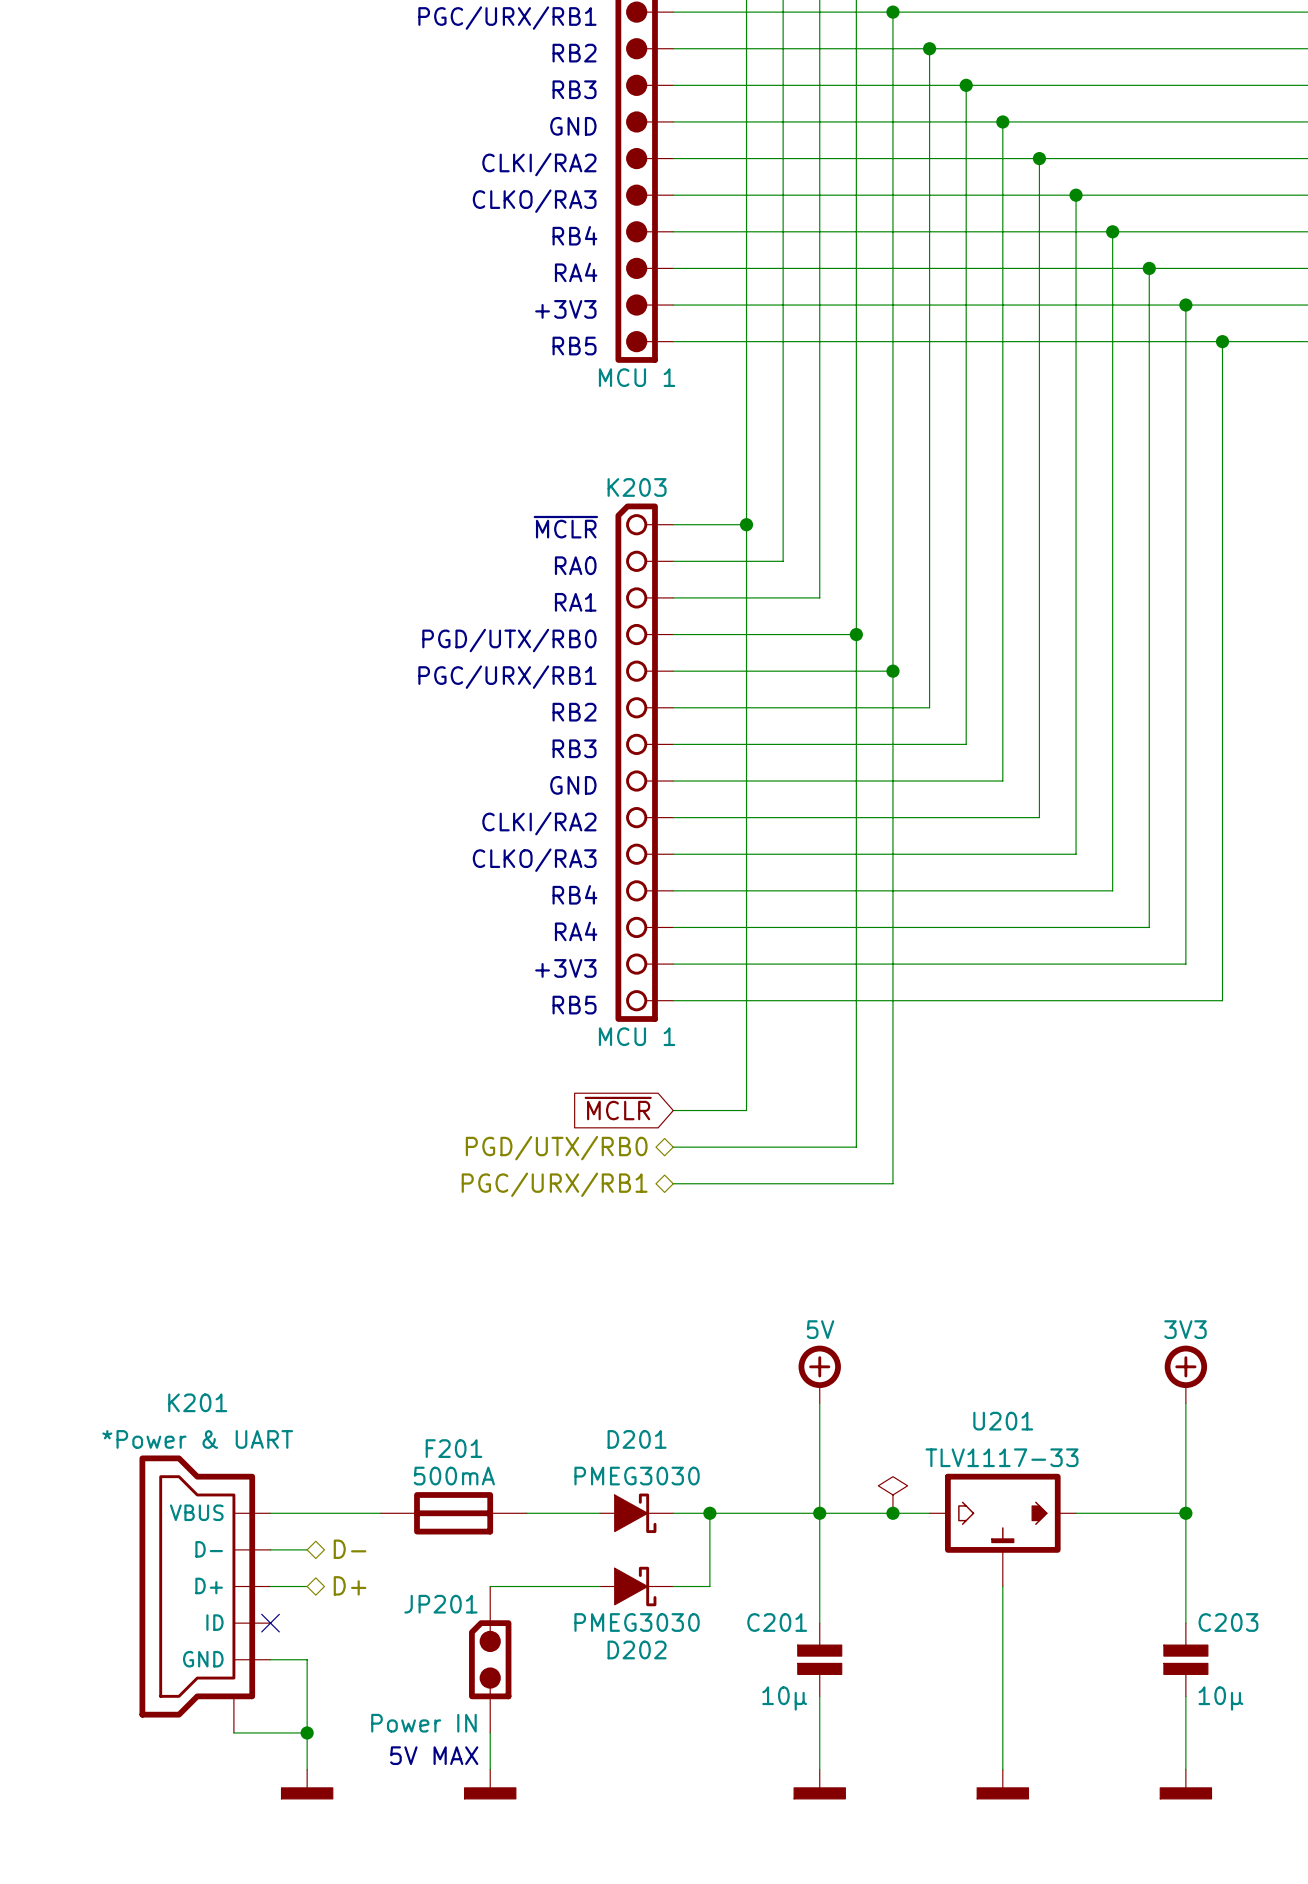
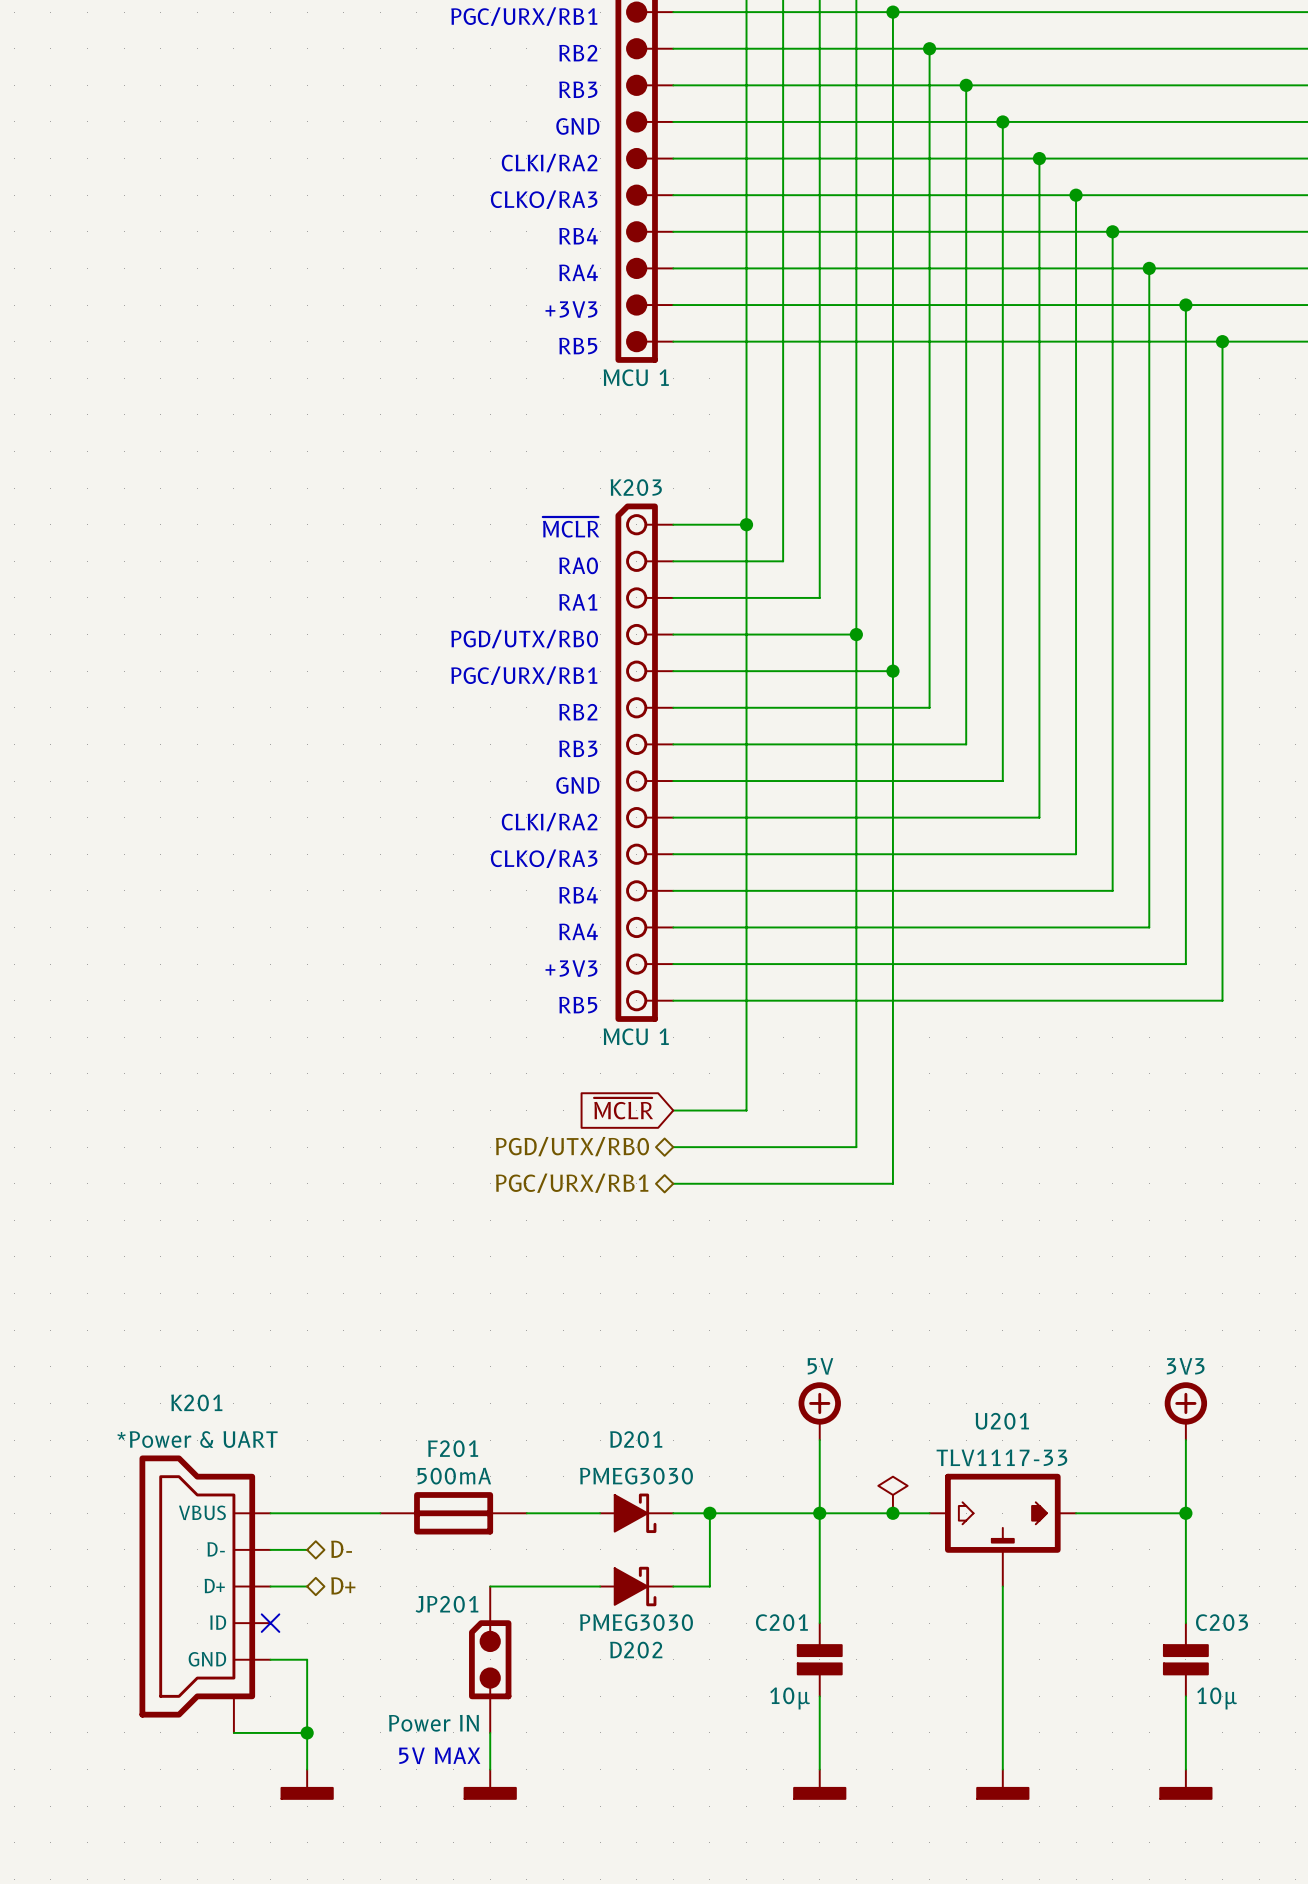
power symbol position: (819, 1374) -> (819, 1411)
power symbol position: (1185, 1374) -> (1185, 1411)

